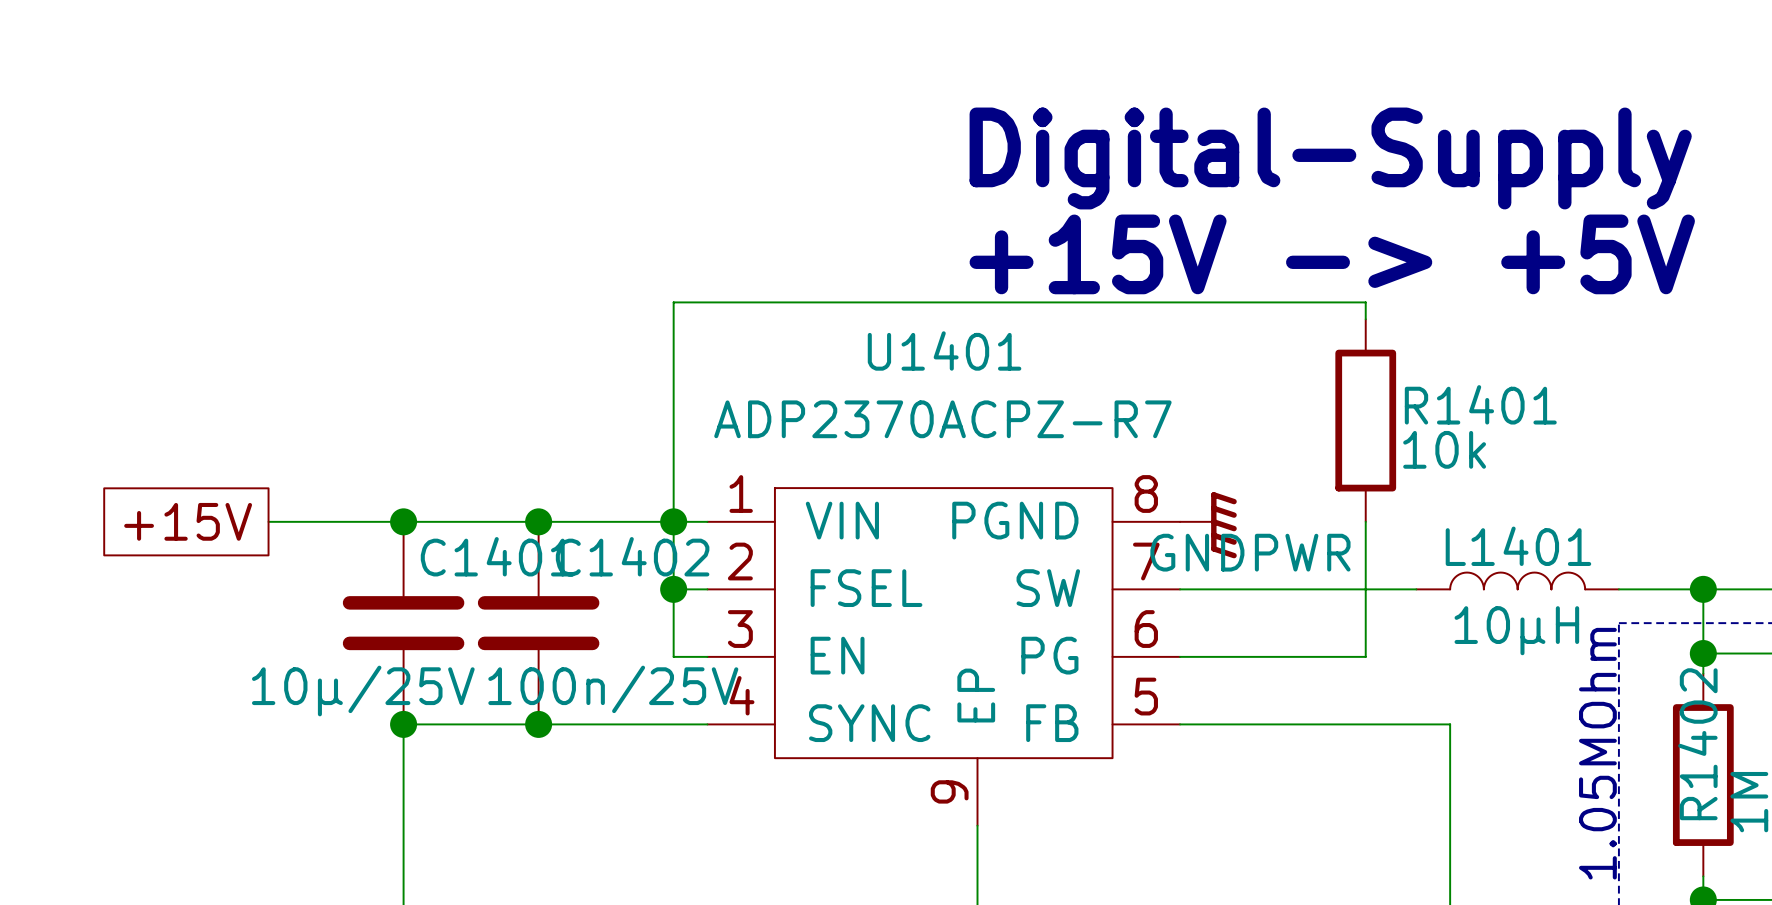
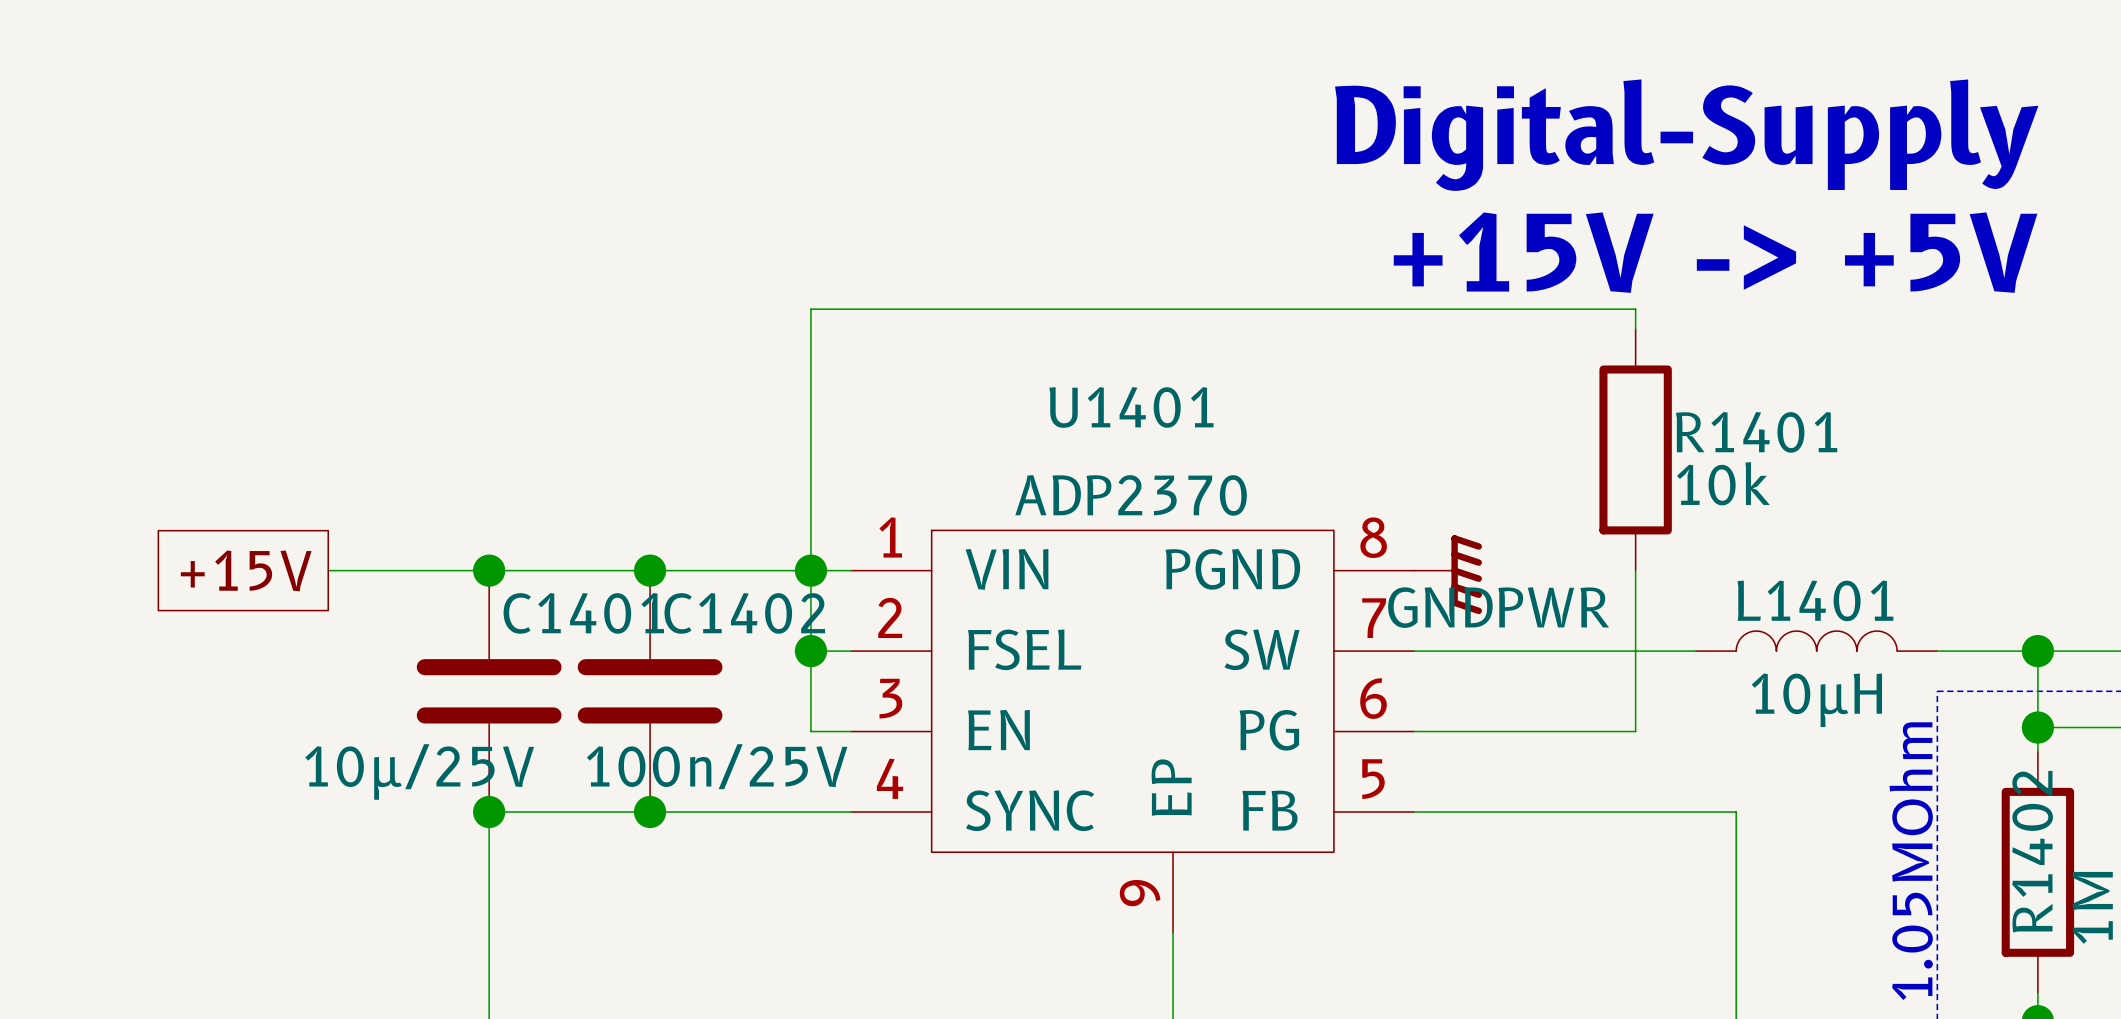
U1401 name position: U1401 (944, 350) -> U1401 (1131, 407)
U1401 value: ADP2370ACPZ-R7 (942, 419) -> ADP2370 (1131, 495)

